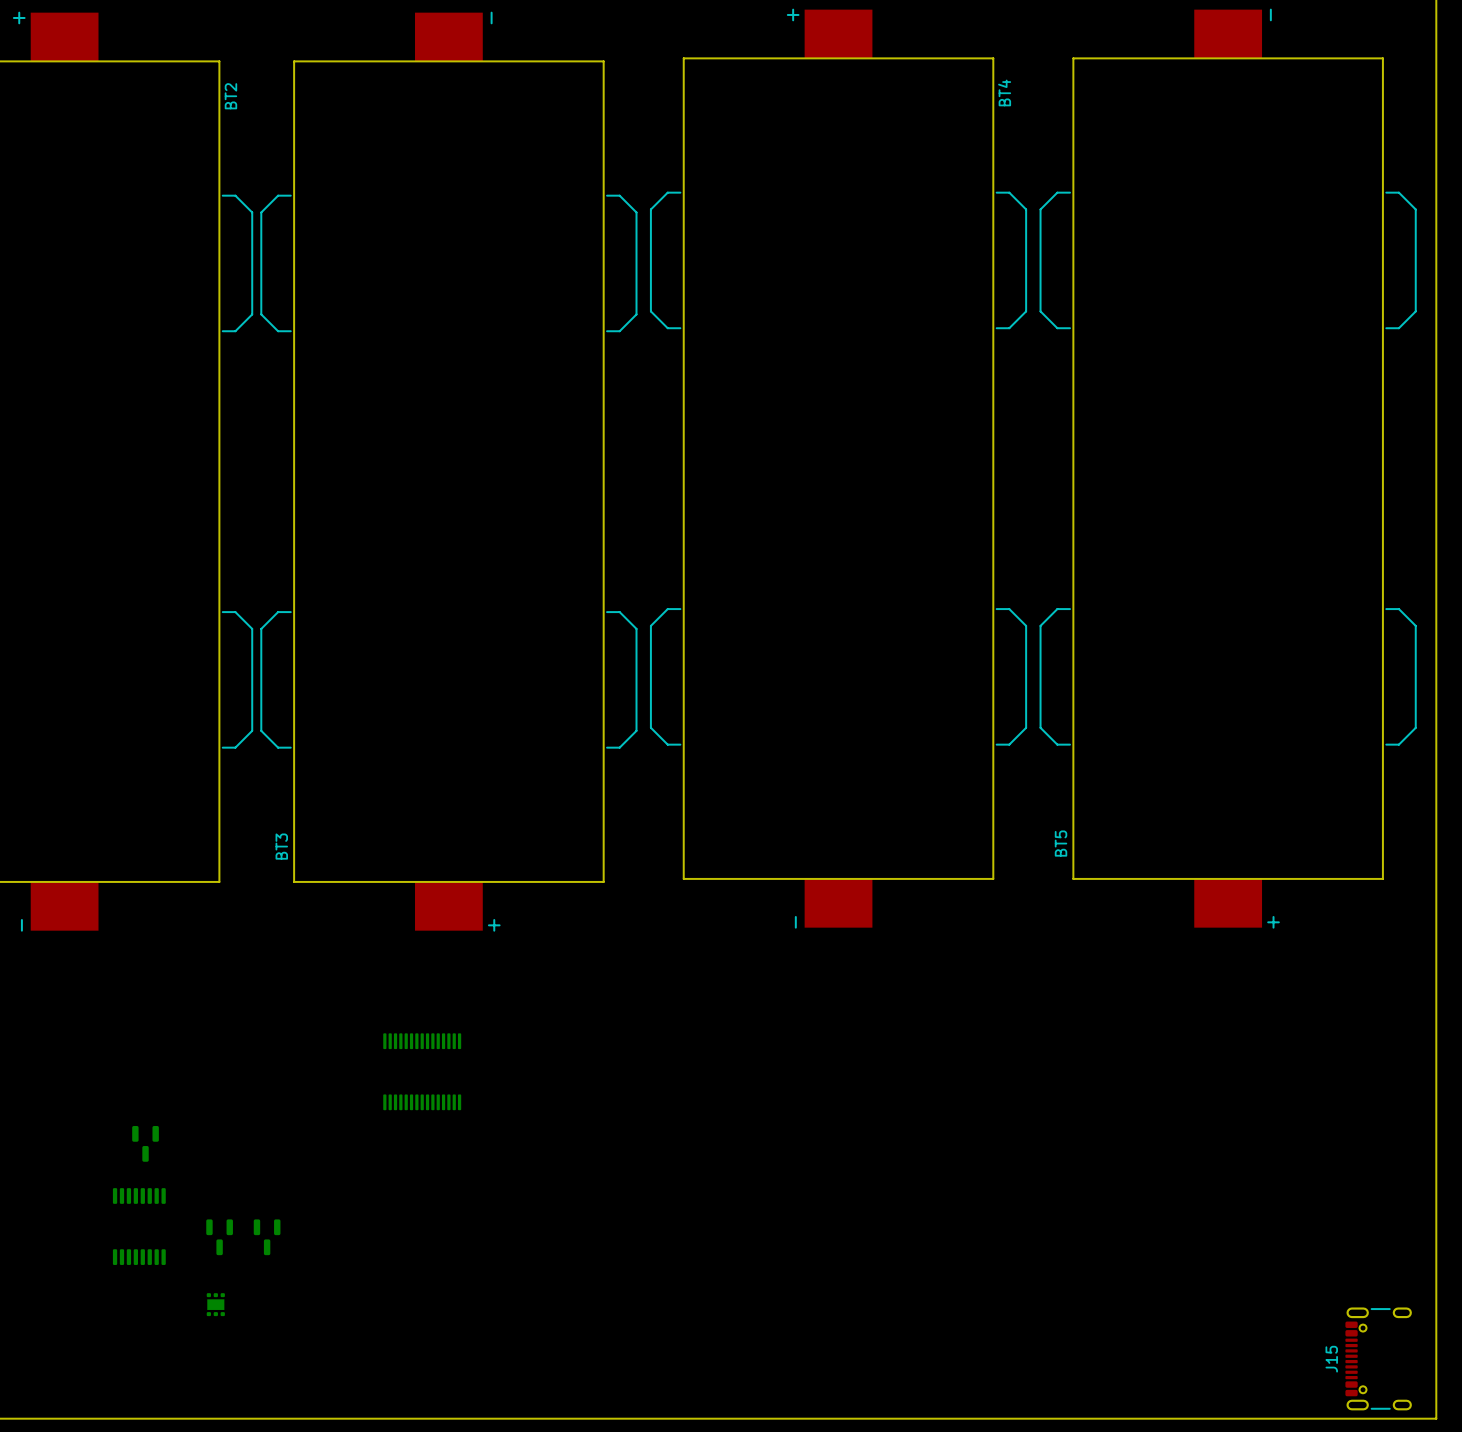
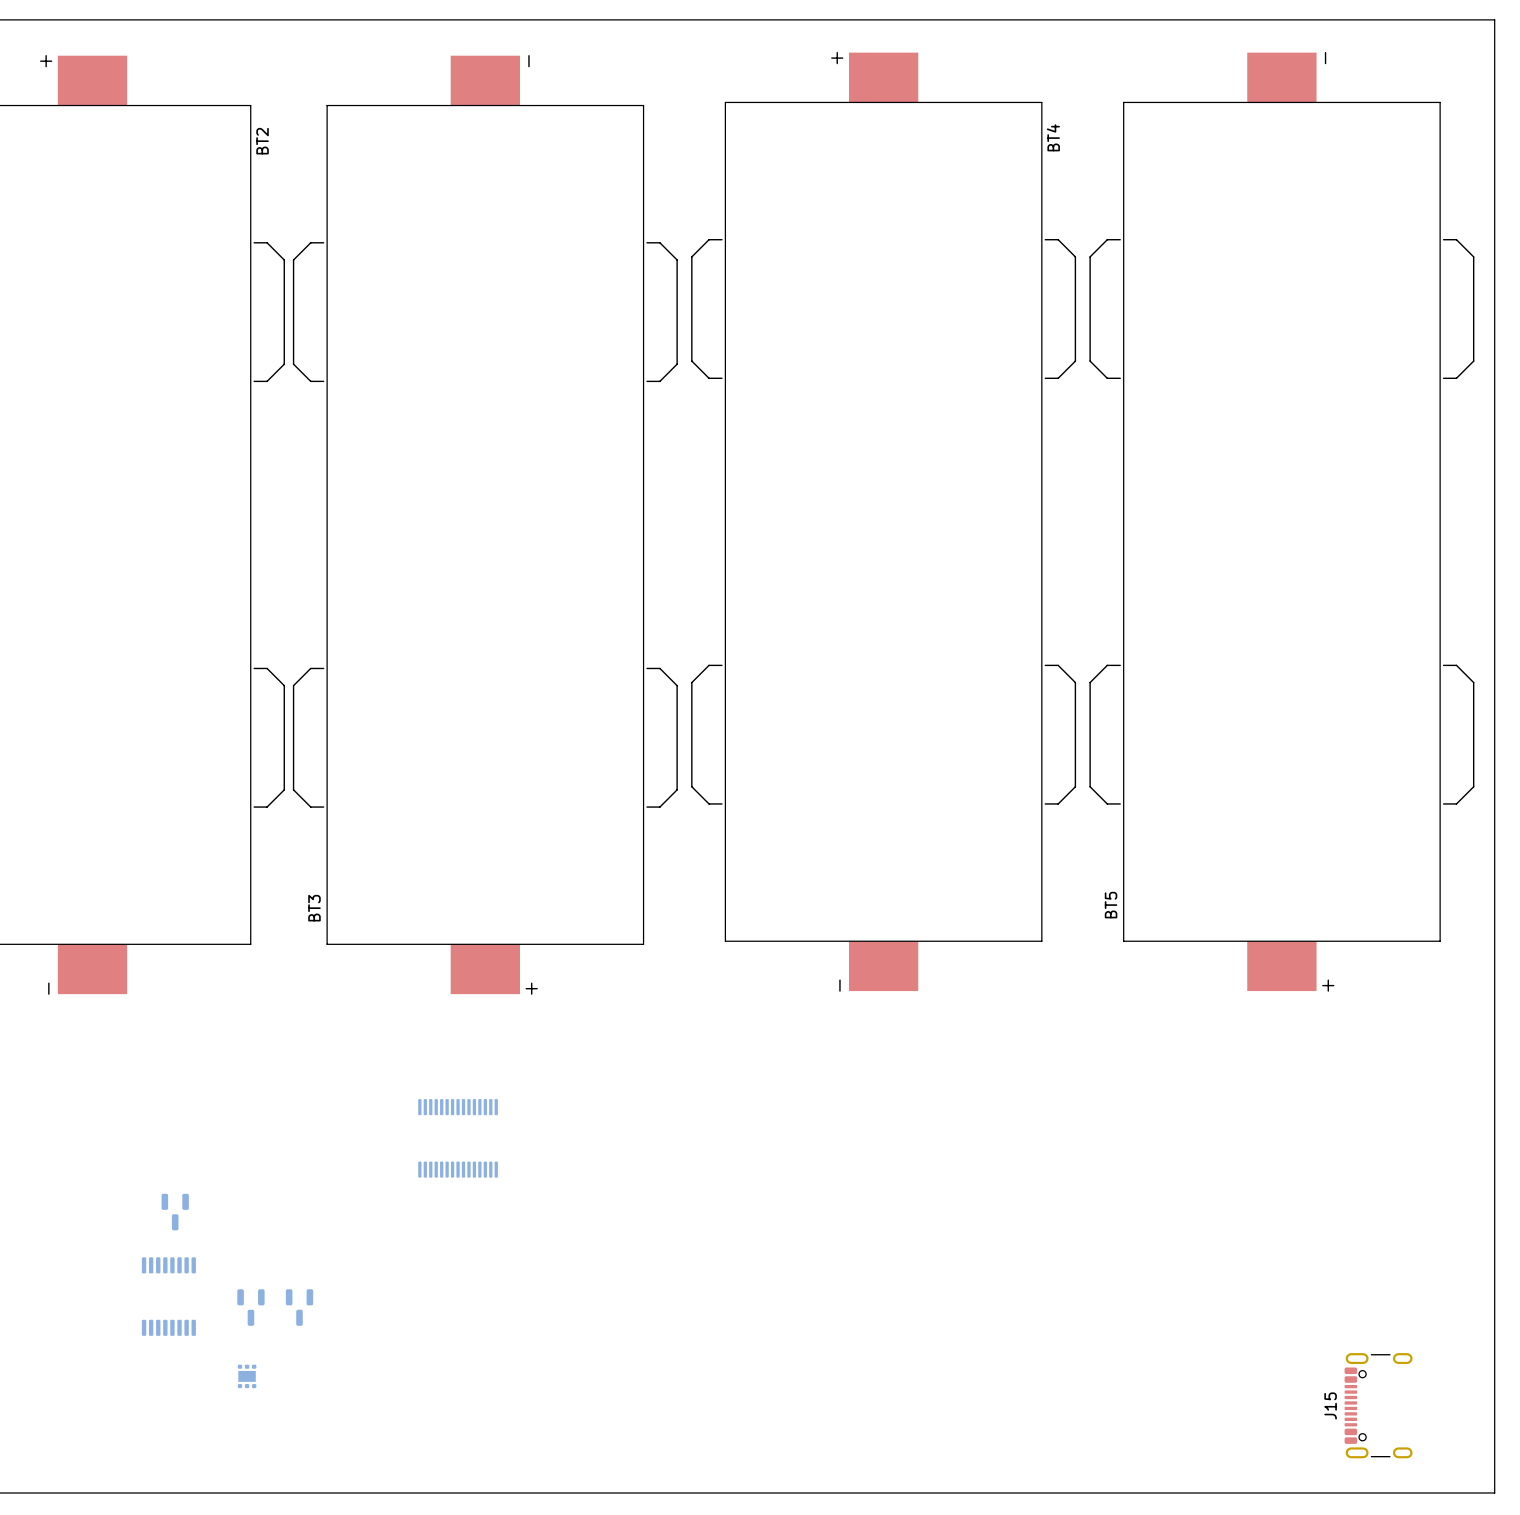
J15 position: (1378, 1358) -> (1378, 1405)

